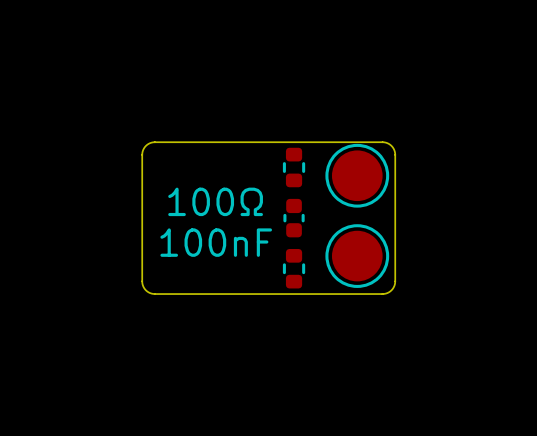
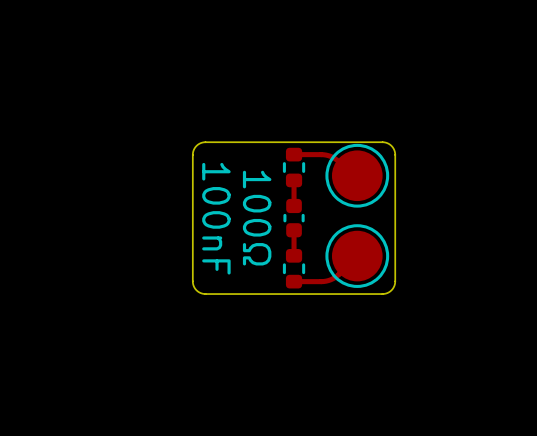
board edge: (205, 142) (151, 142) (144, 147) (142, 154) (143, 286) (147, 291) (153, 293) (205, 294) -> (205, 142) (196, 145) (192, 154) (192, 283) (196, 290) (205, 294)
top track: none -> (294, 154) (330, 156) (357, 180)
top track: none -> (294, 180) (294, 205)
text rotation: 0° (215, 201) -> 90° clockwise (257, 218)
top track: none -> (294, 230) (294, 255)
text rotation: 0° (216, 242) -> 90° clockwise (216, 218)
top track: none -> (357, 256) (330, 279) (294, 281)

